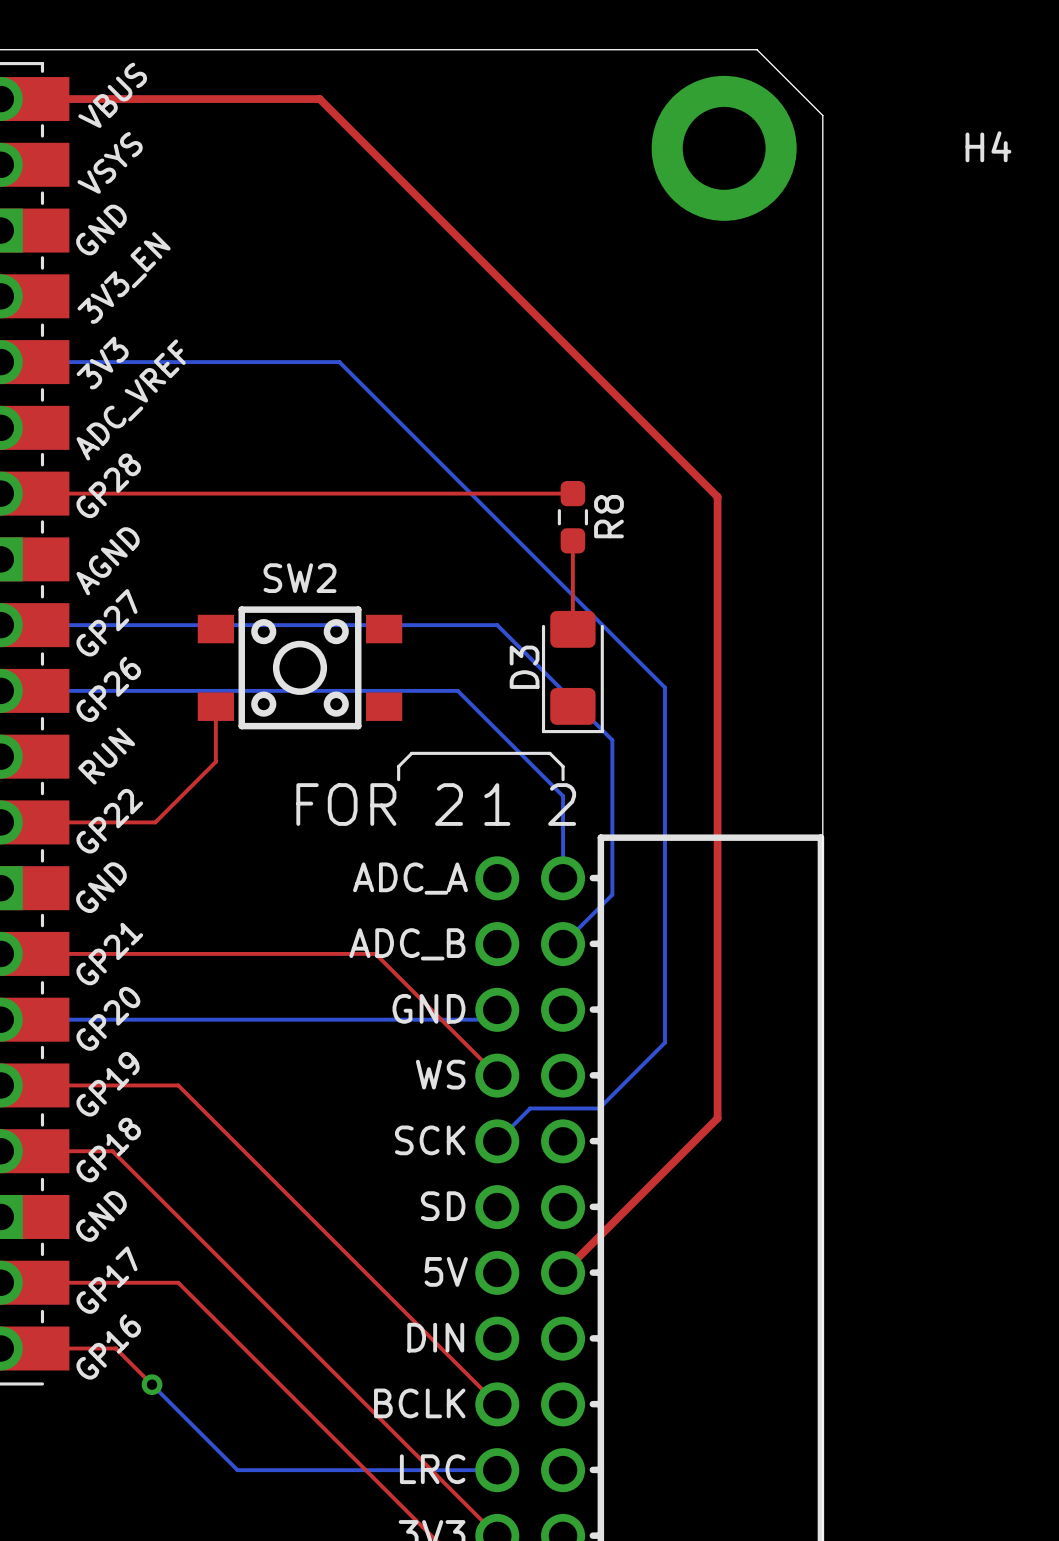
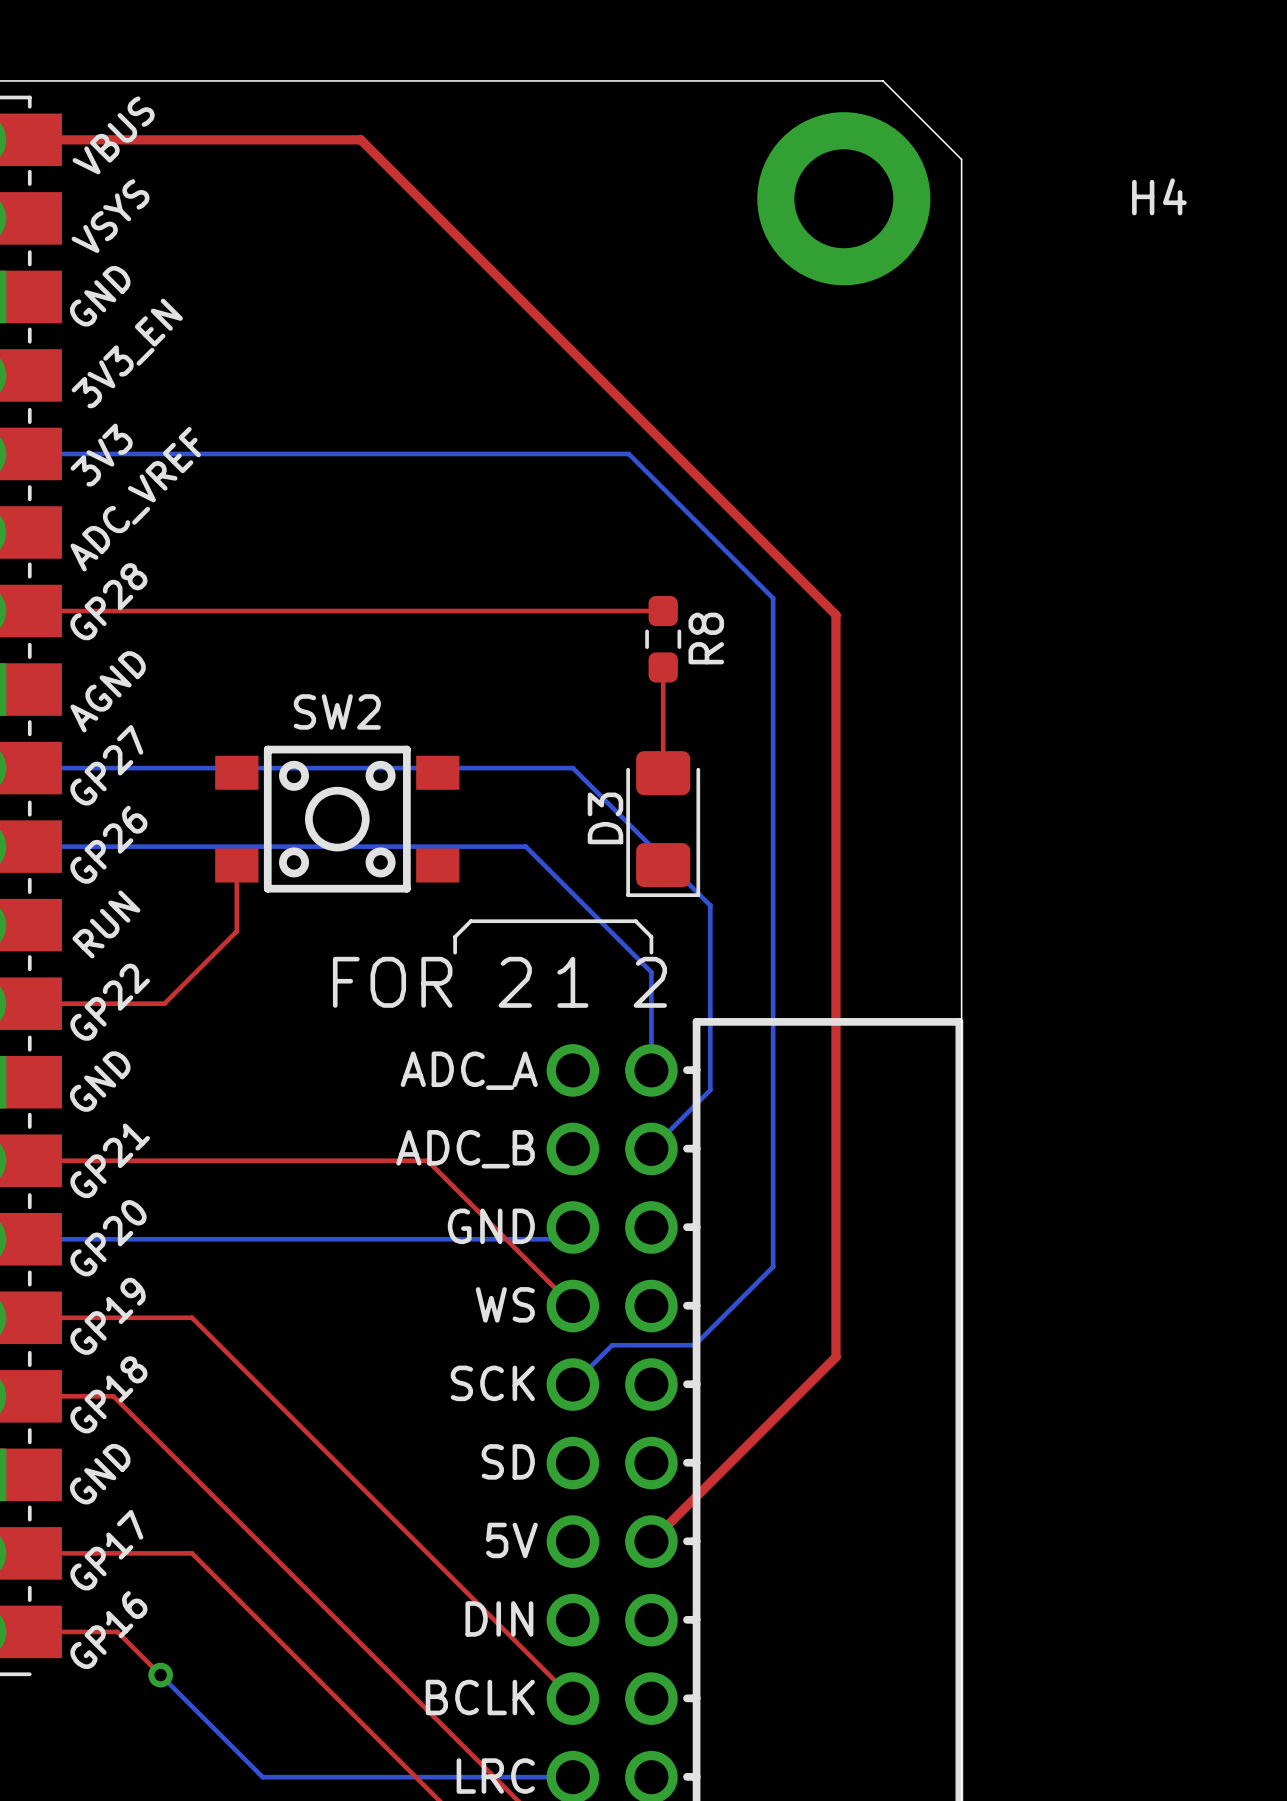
bottom track: (339, 362) (664, 687) -> (384, 453) (628, 453) (773, 598) (773, 842)

